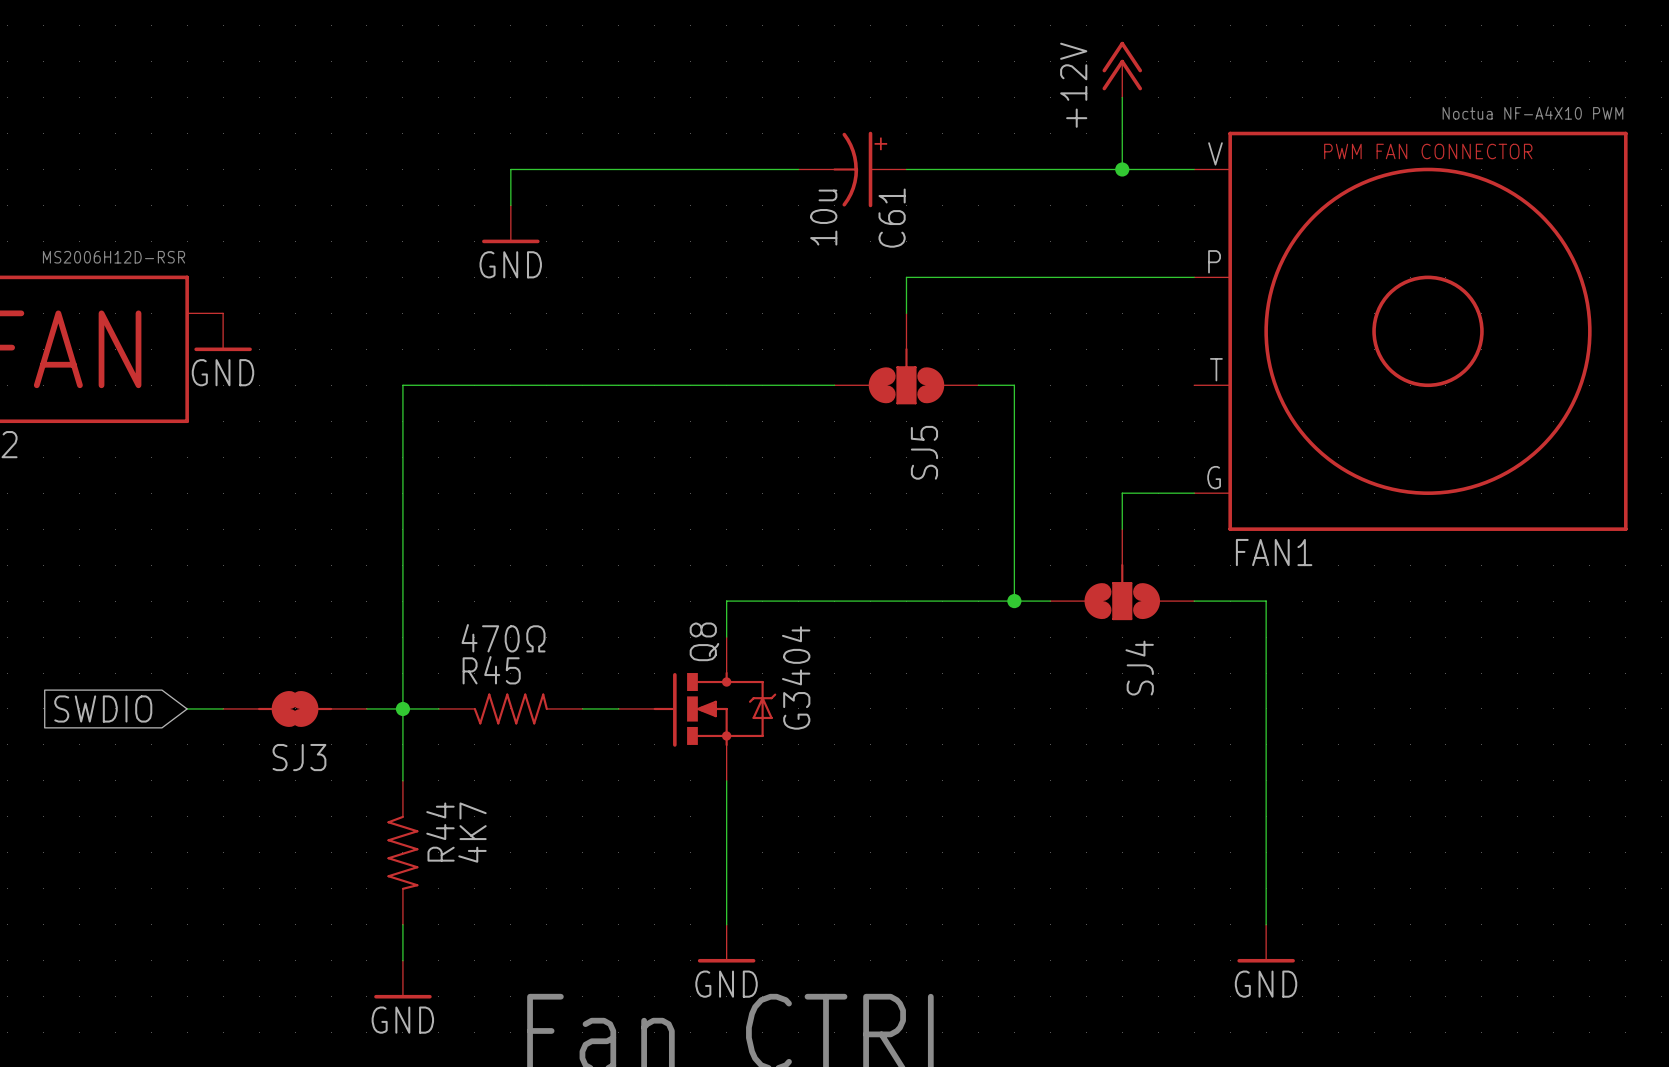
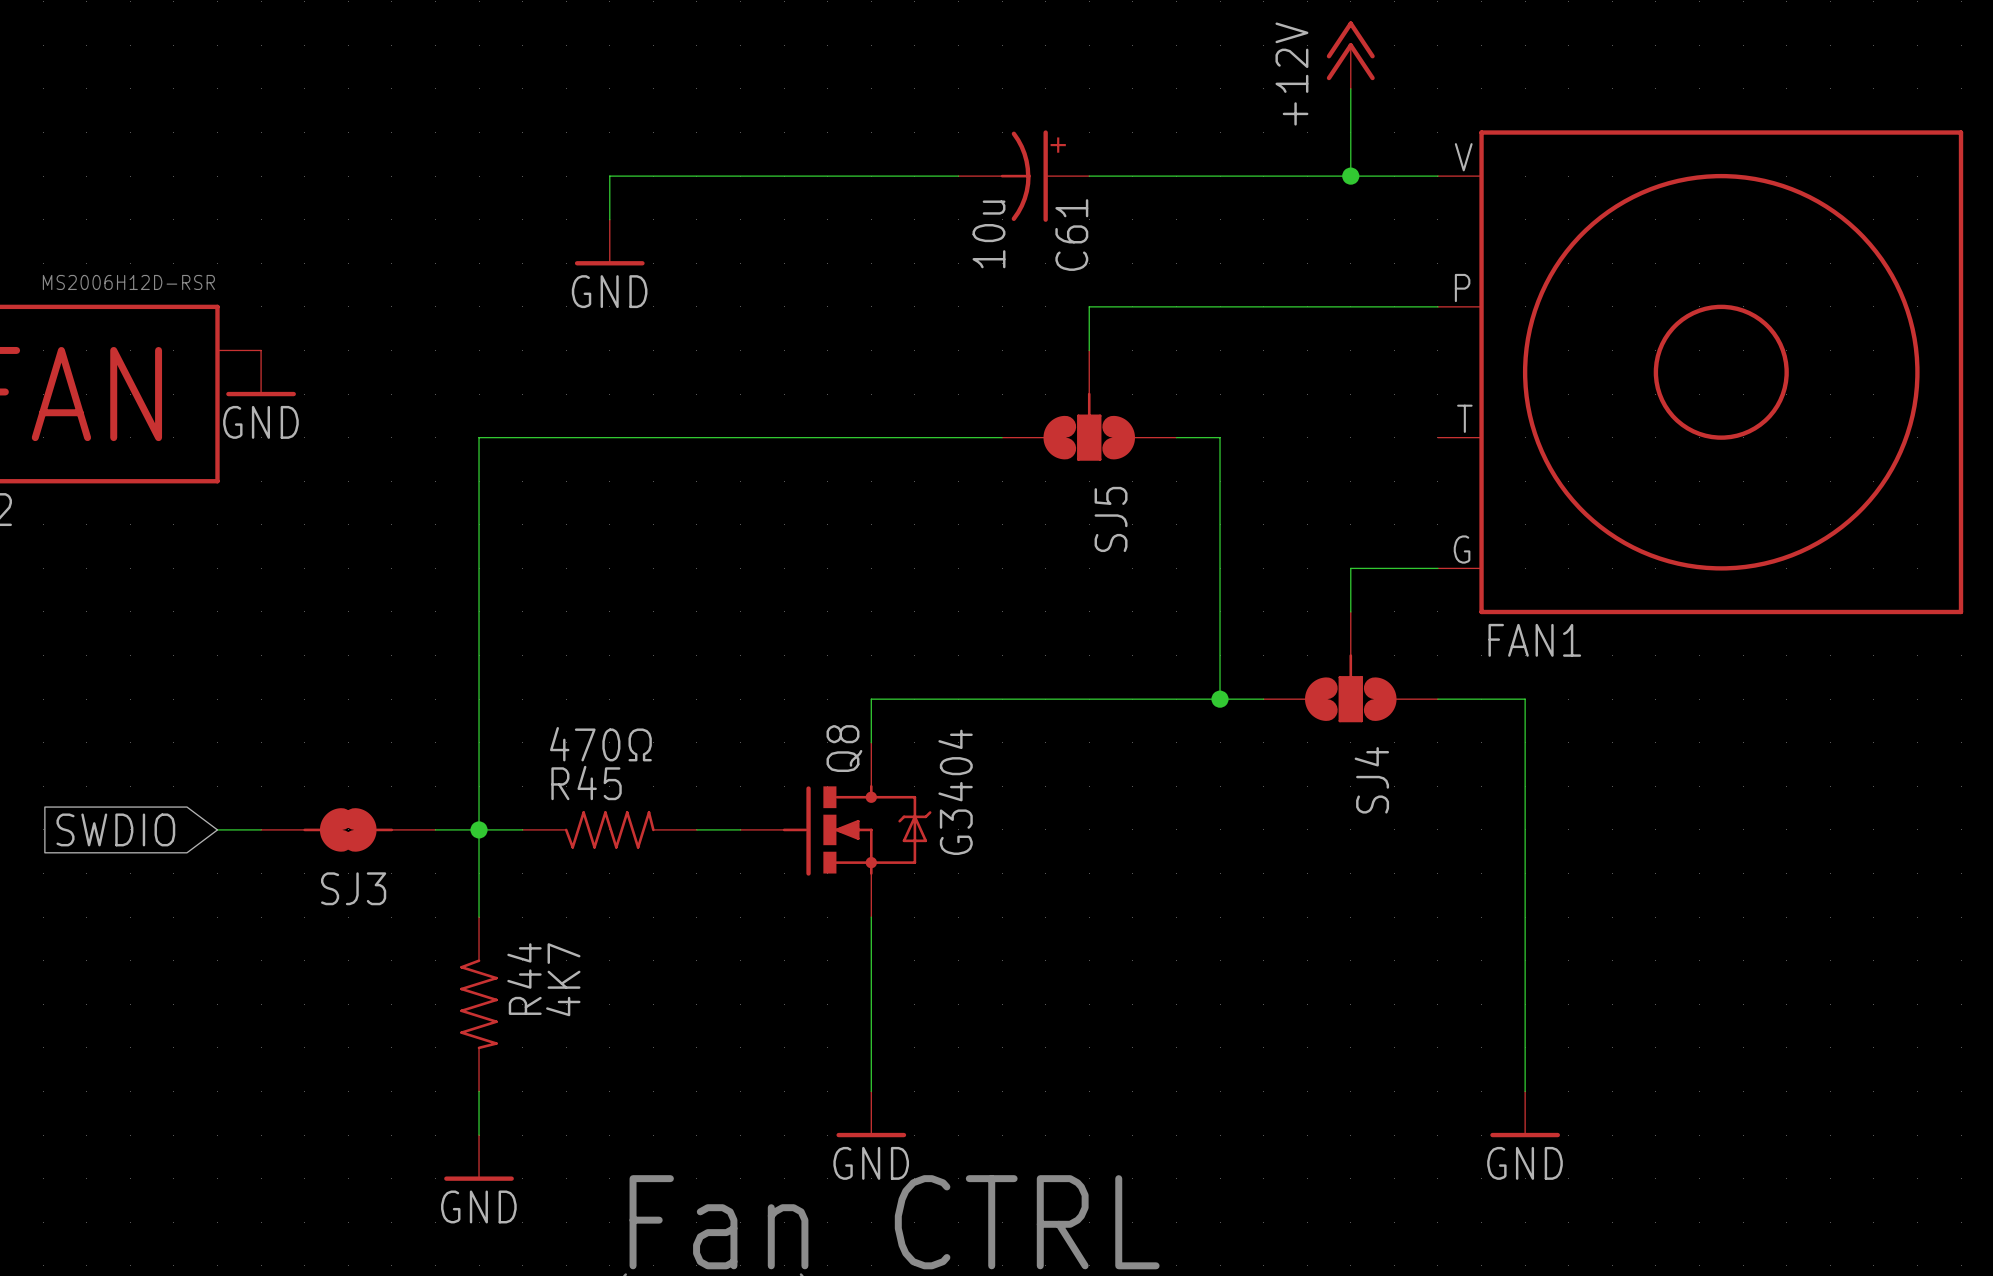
text: Noctua NF-A4X10 PWM (1532, 113) -> none
FAN1 text: PWM FAN CONNECTOR (1428, 151) -> none

